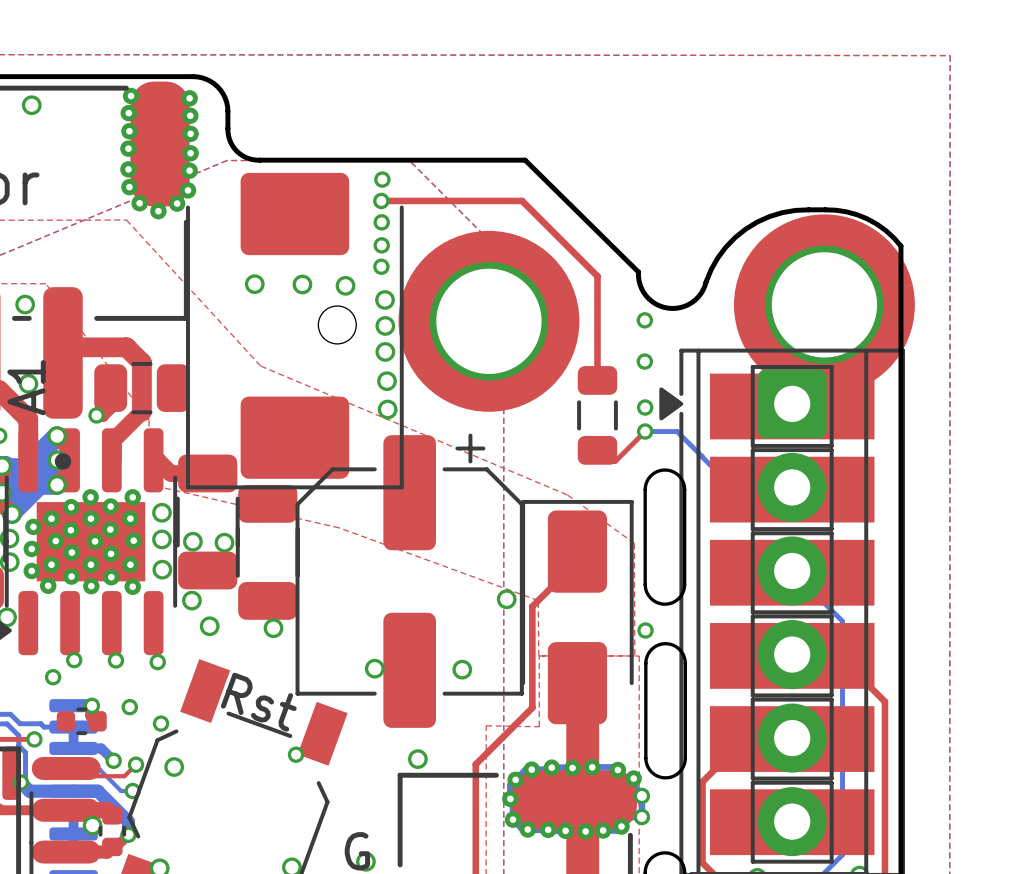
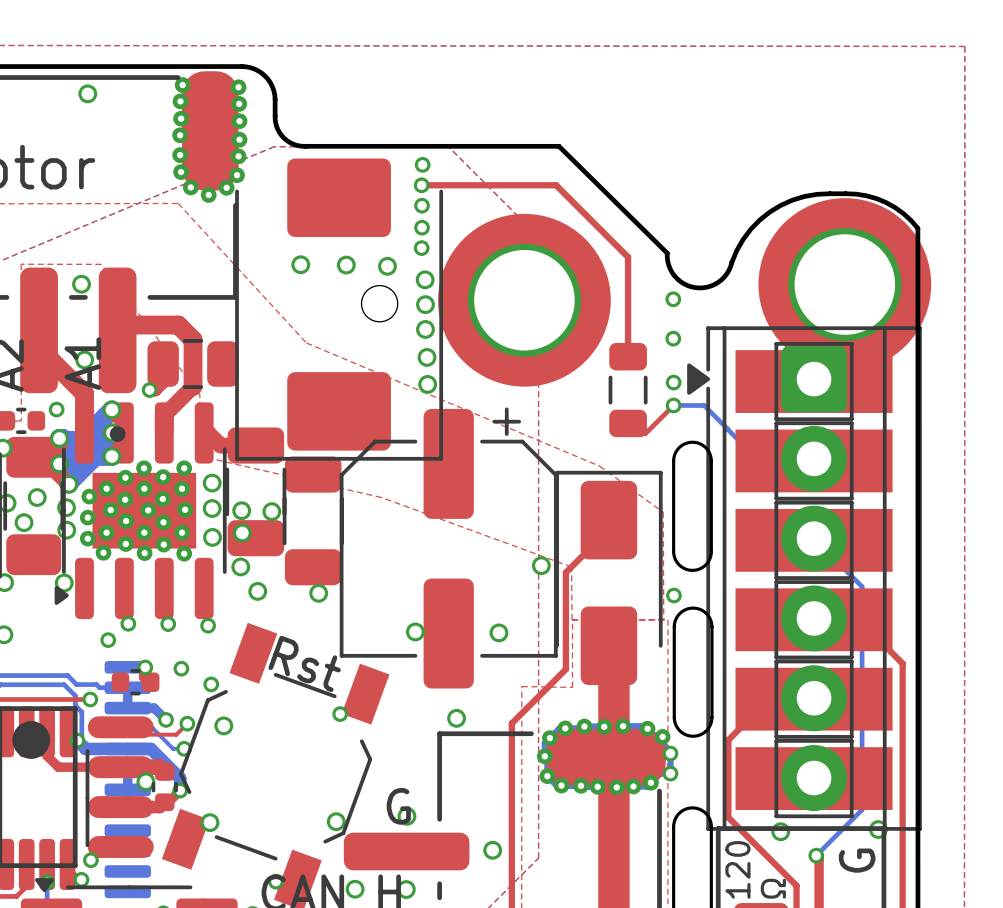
via: none -> (242, 533)

